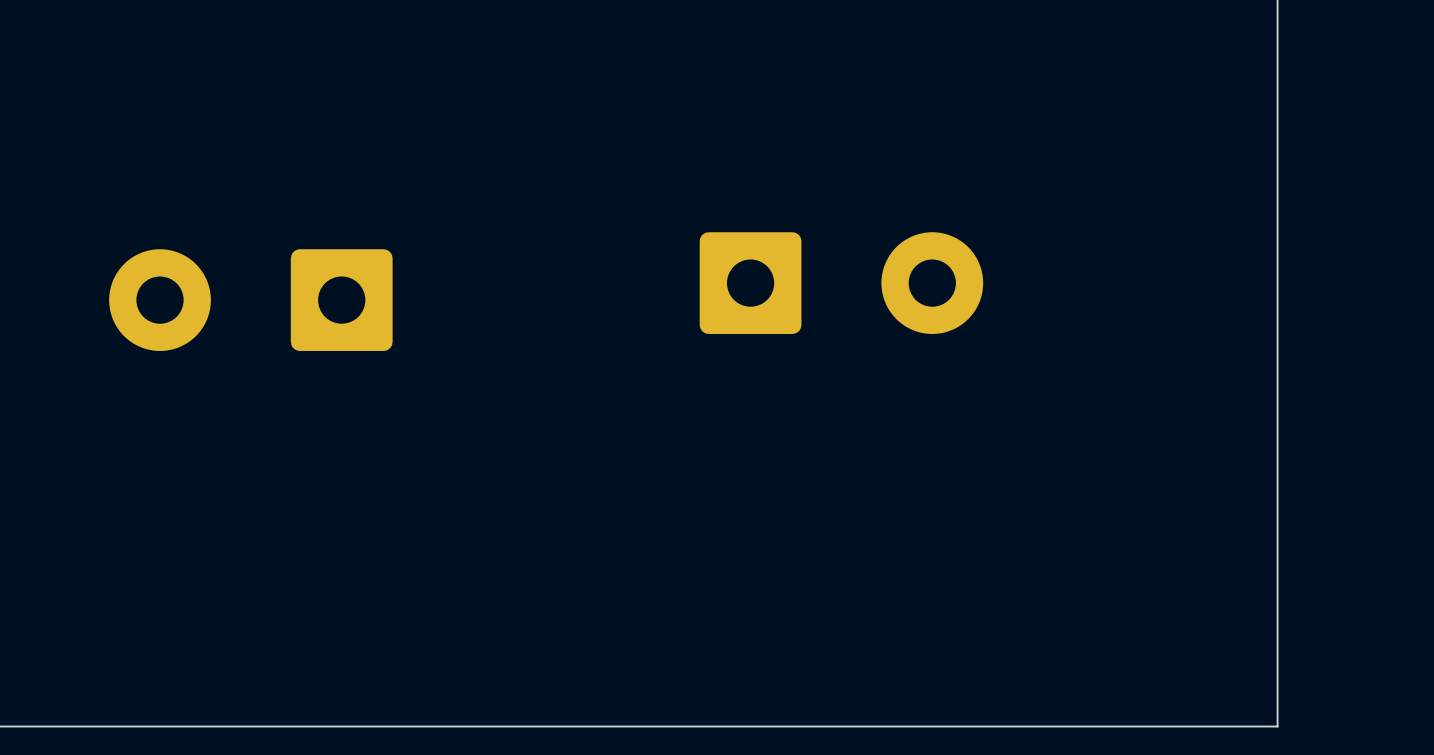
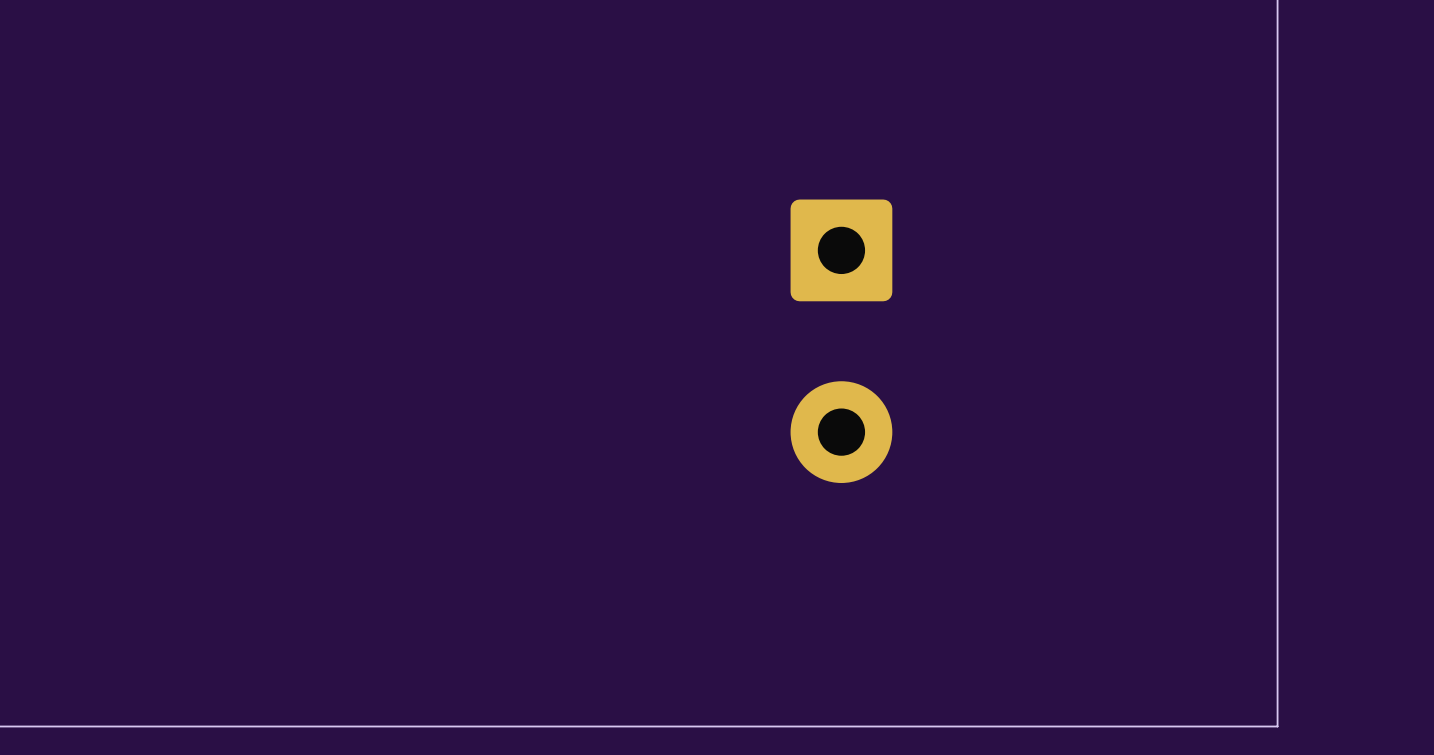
part rotation: 0° (841, 283) -> 90° clockwise (841, 341)
part: (250, 300) -> none

